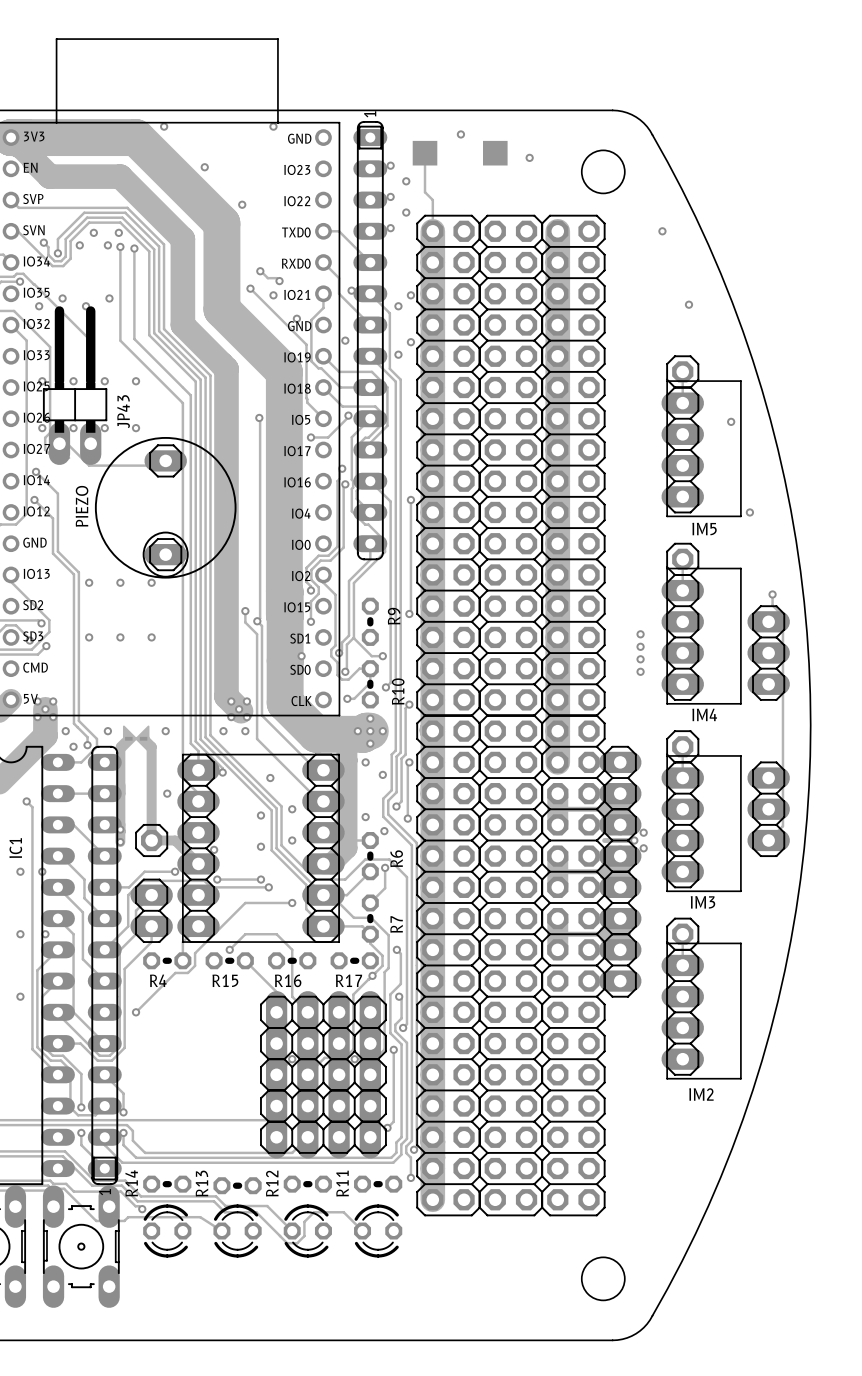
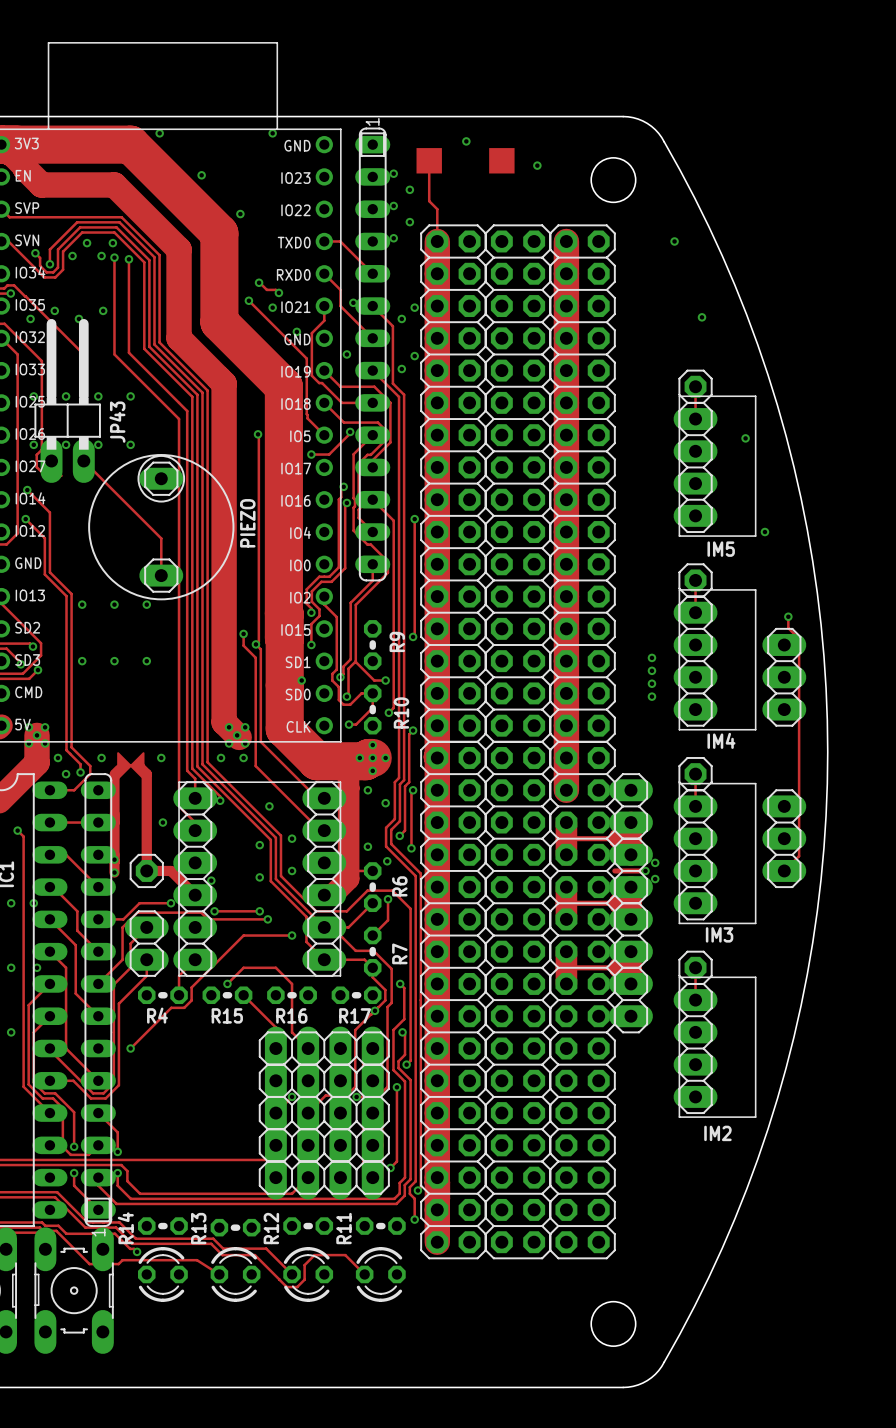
track: (59, 443) (67, 443) (89, 465) (161, 465) (165, 460) -> none
track: none -> (83, 460) (161, 538) (161, 575)
PIEZO rotation: 0° (165, 507) -> 180° (161, 527)

